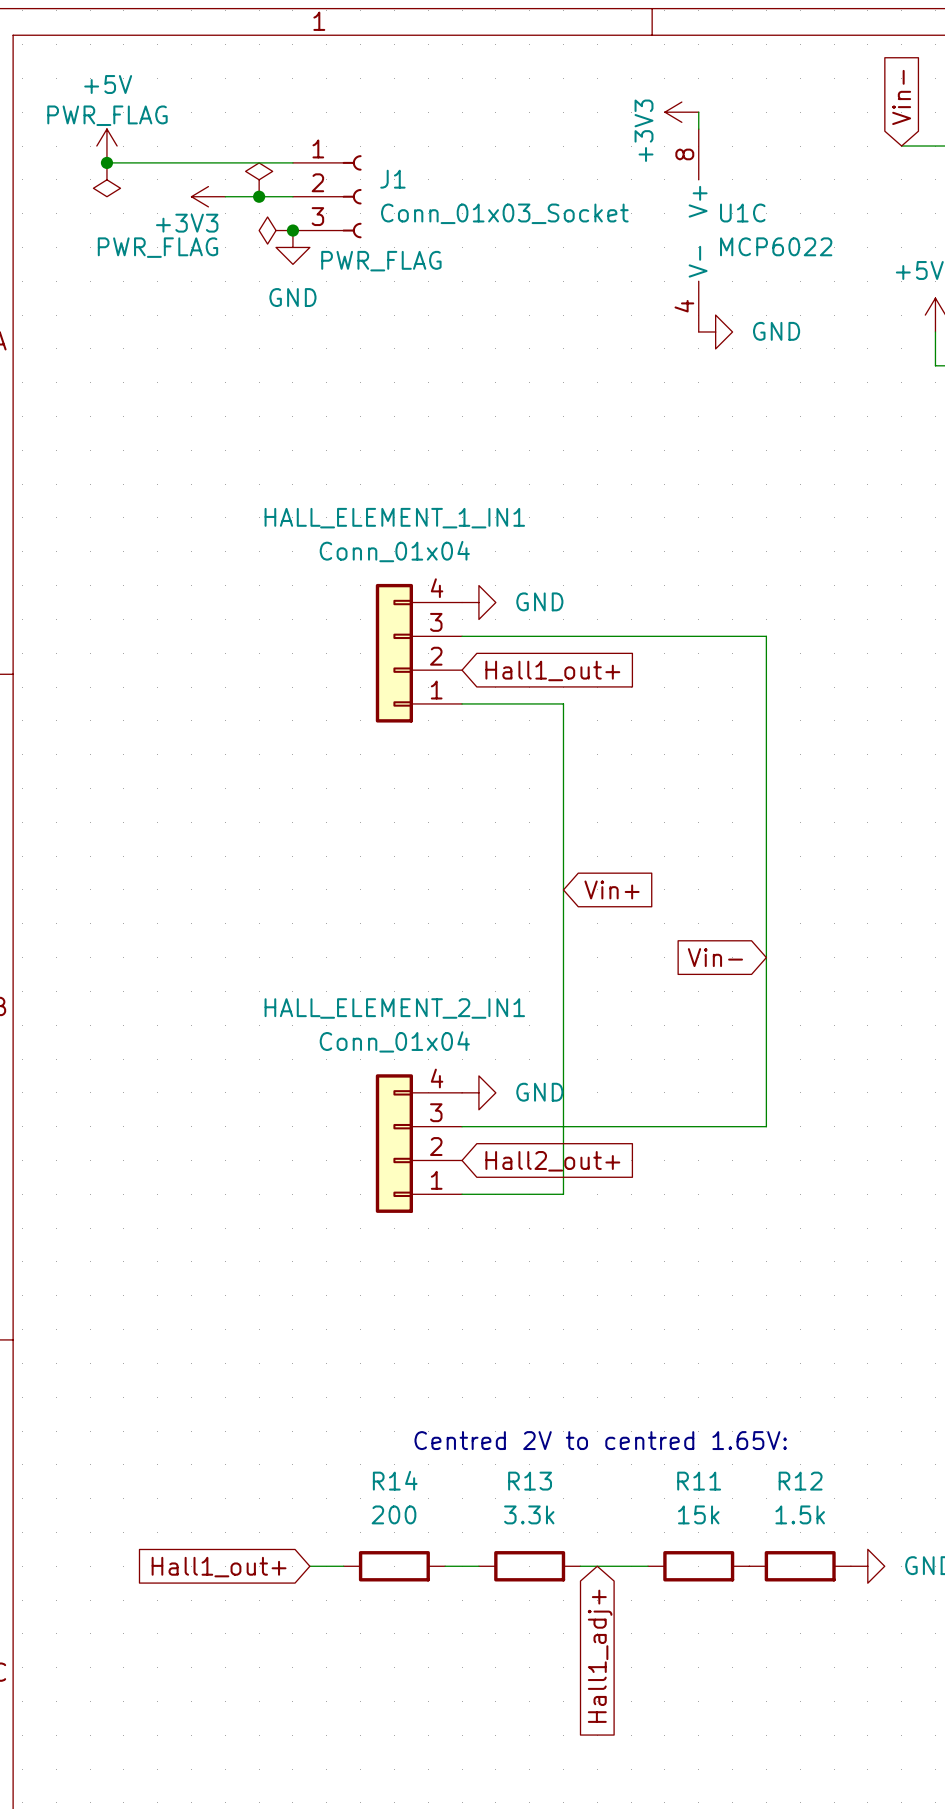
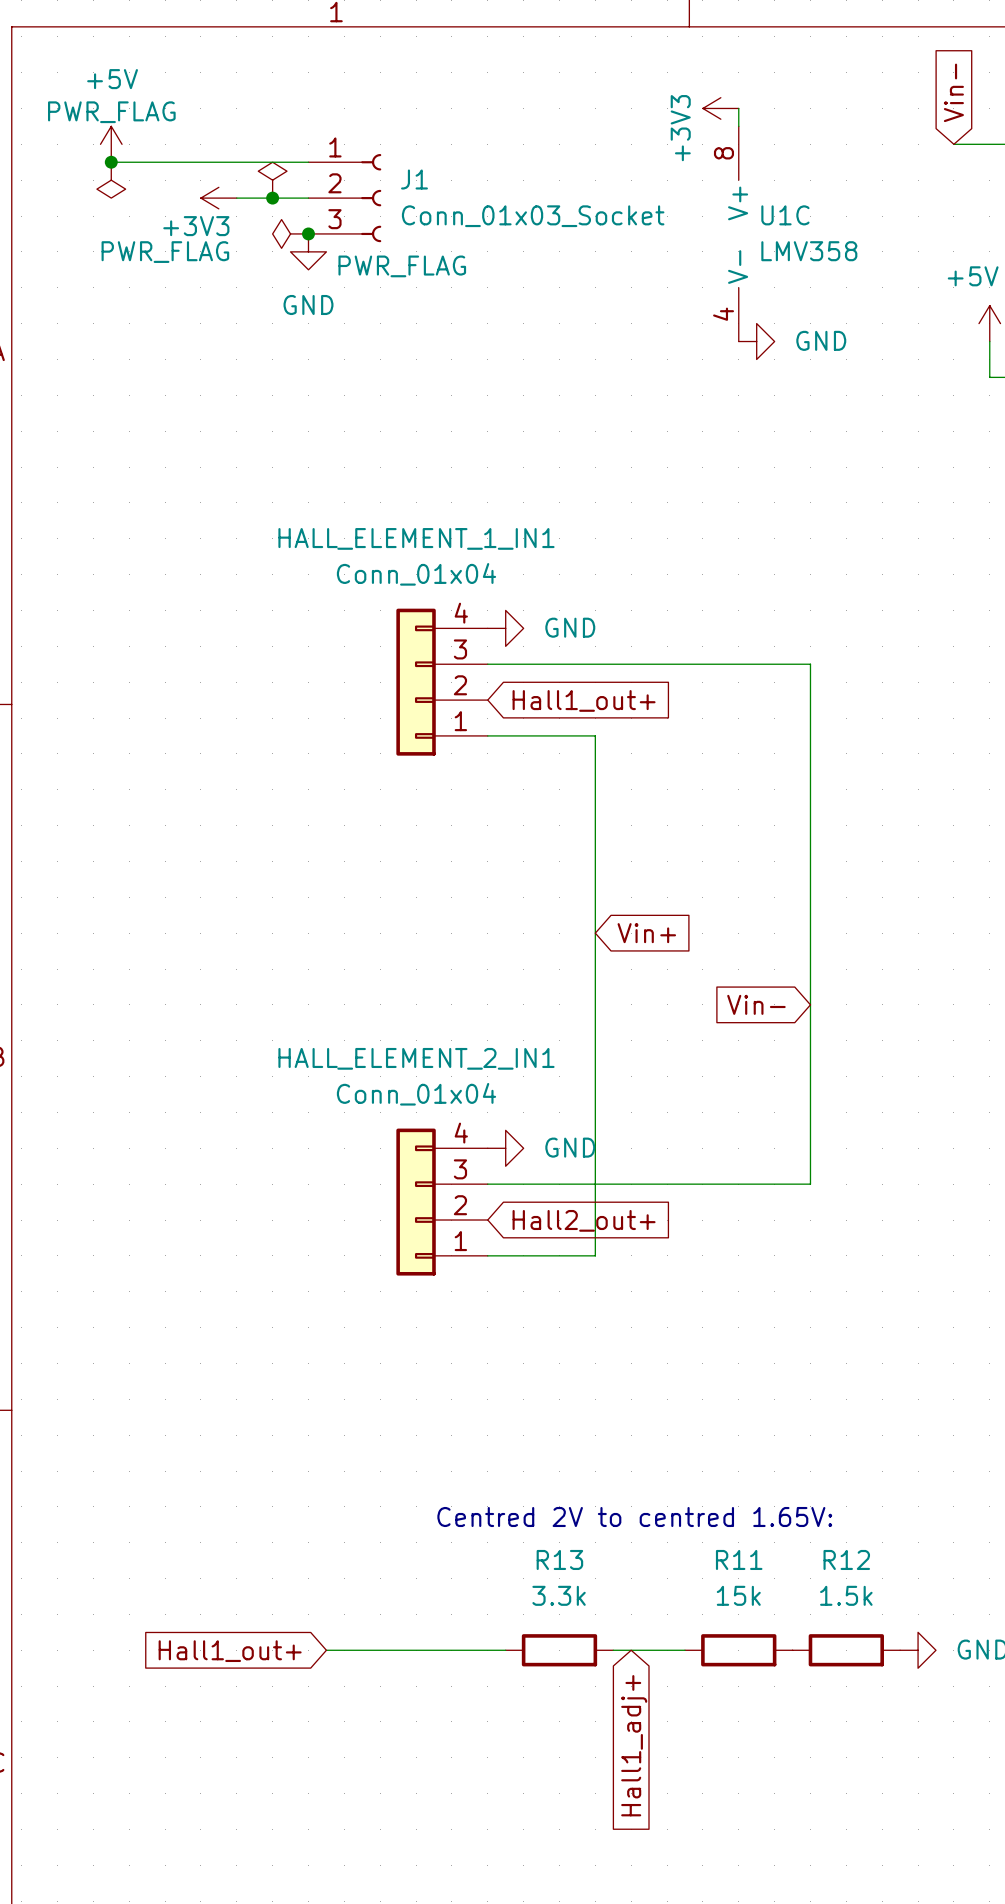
U1C value: MCP6022 (776, 246) -> LMV358 (809, 251)
wire: none -> (362, 1650) (469, 1650)
R14: 200 (394, 1566) -> none

